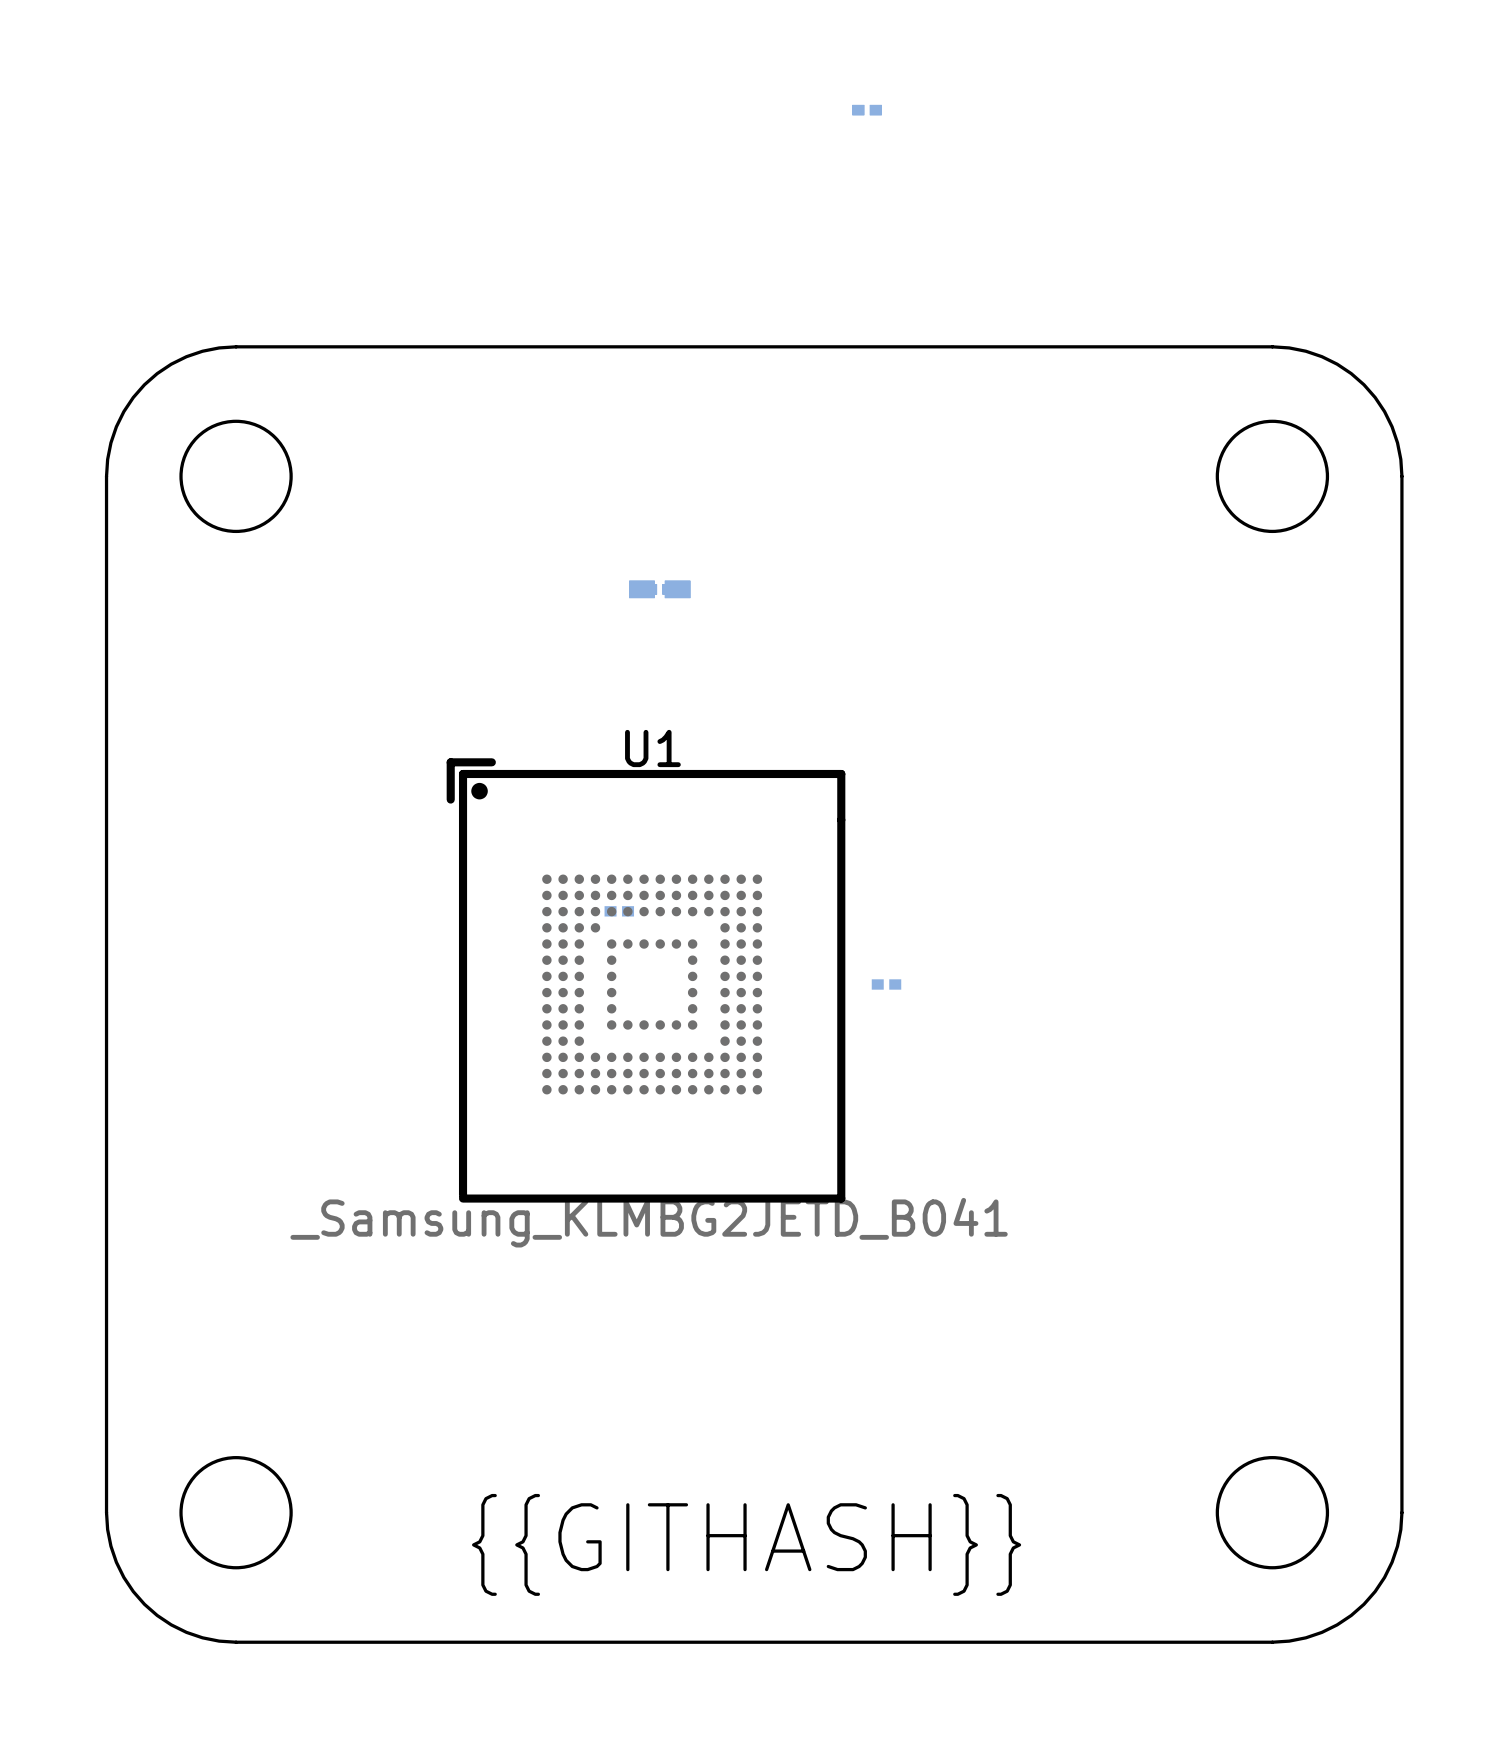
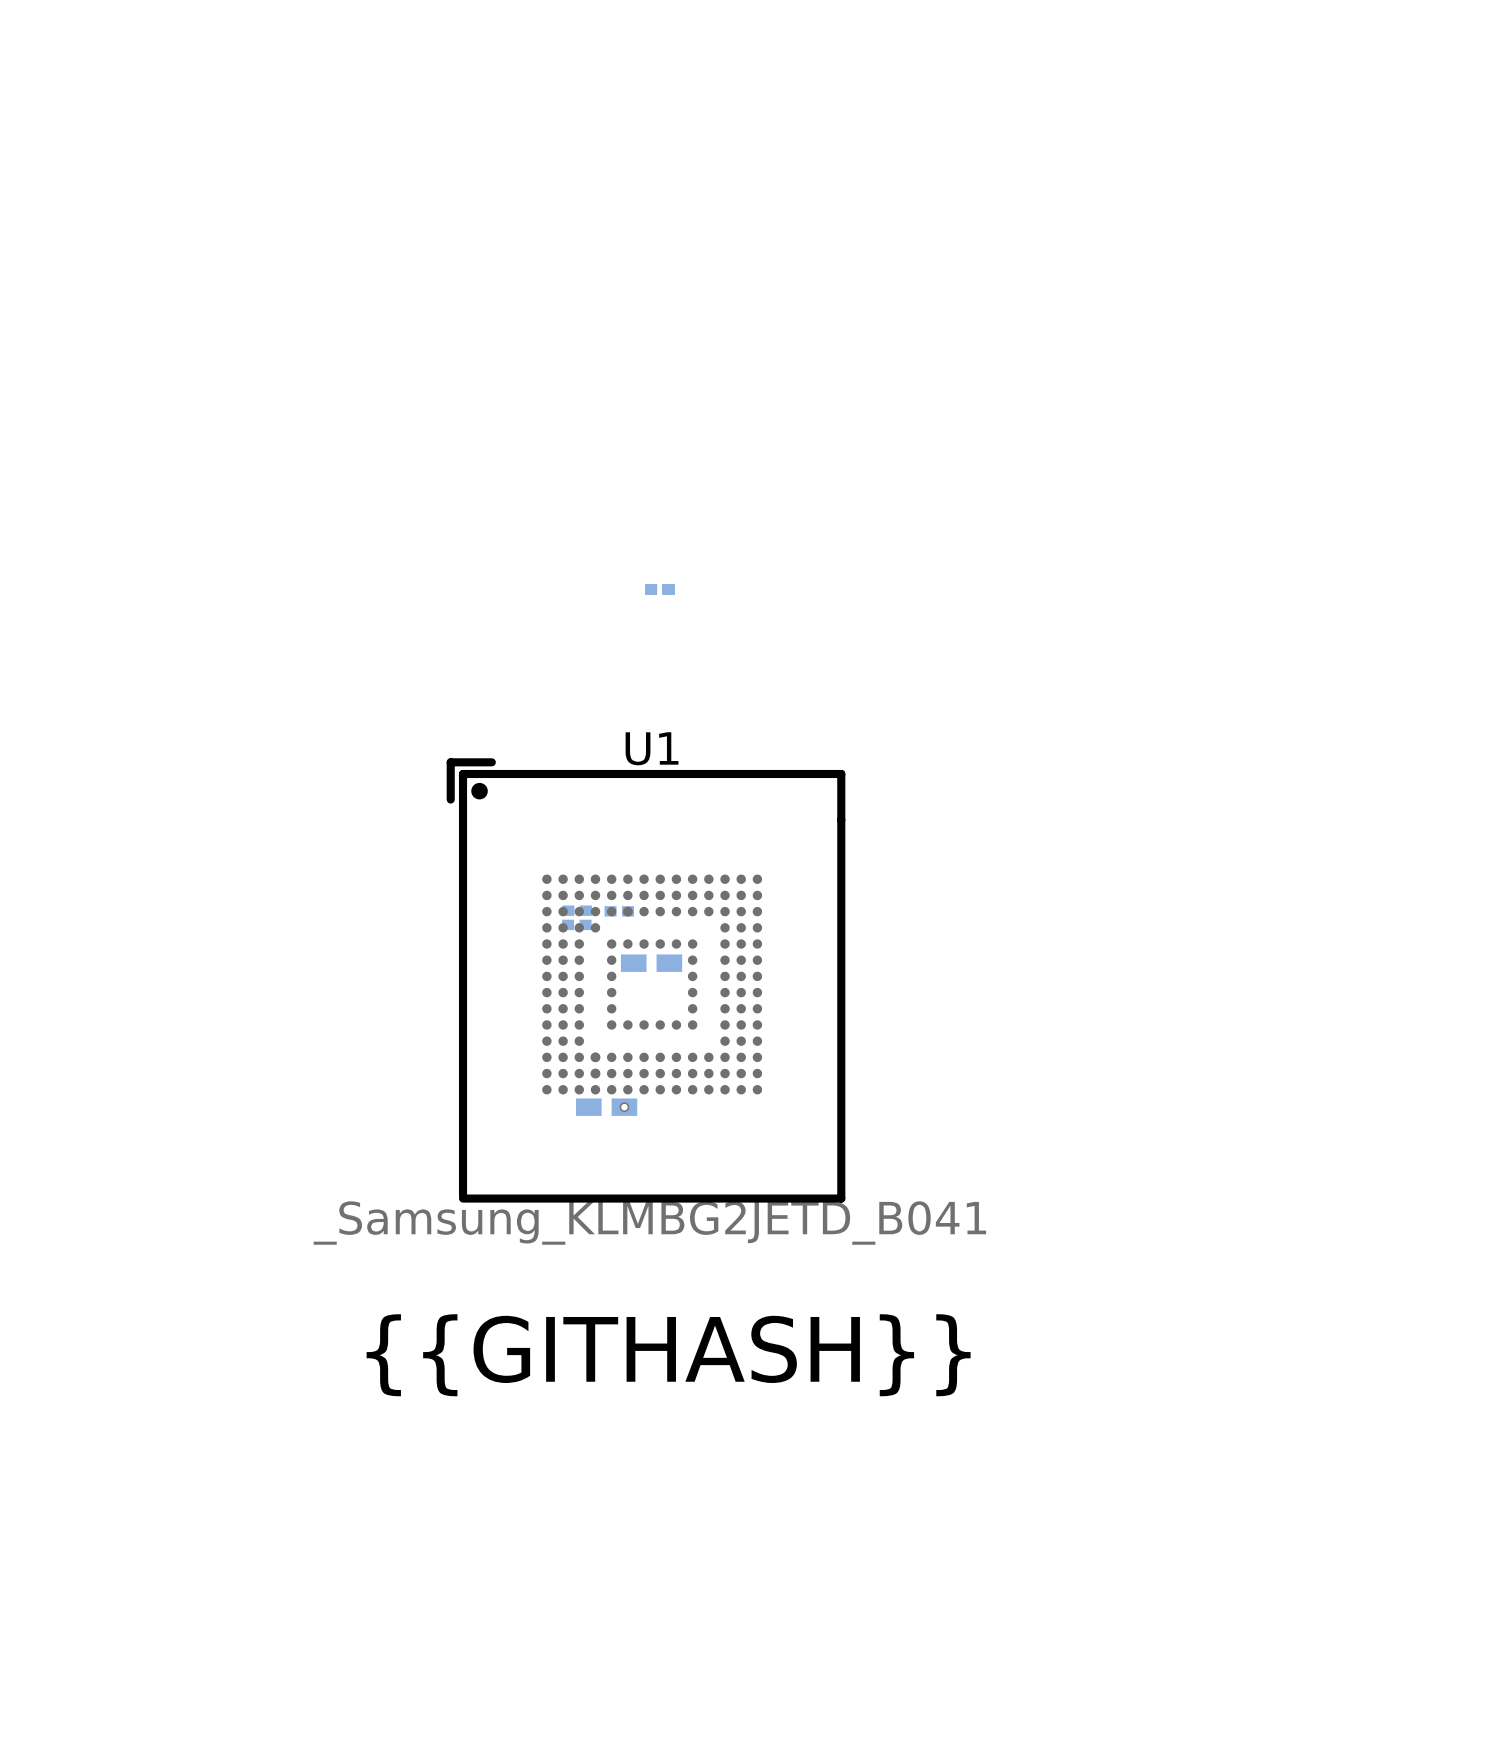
part: (867, 110) -> none
board edge: (236, 346) (1272, 346) (1305, 351) (1321, 356) (1337, 364) (1363, 384) (1384, 411) (1392, 426) (1400, 459) (1401, 476) (1401, 1512) (1397, 1546) (1392, 1562) (1384, 1577) (1363, 1604) (1351, 1615) (1321, 1632) (1305, 1637) (1272, 1642) (236, 1642) (202, 1637) (186, 1632) (157, 1615) (144, 1604) (133, 1591) (116, 1562) (110, 1546) (106, 1512) (107, 459) (116, 426) (123, 411) (144, 384) (157, 373) (186, 356) (202, 351) (236, 346) -> none
round board edge: [179, 419, 293, 534] -> none
round board edge: [1215, 419, 1330, 534] -> none
part: (659, 589) -> none
part: none -> (577, 910)
part: none -> (576, 924)
part: none -> (651, 963)
part: (886, 984) -> none
part: none -> (606, 1107)
via: none -> (624, 1107)
round board edge: [179, 1456, 293, 1570] -> none
round board edge: [1215, 1456, 1330, 1570] -> none
text position: {{GITHASH}} (746, 1544) -> {{GITHASH}} (668, 1355)

